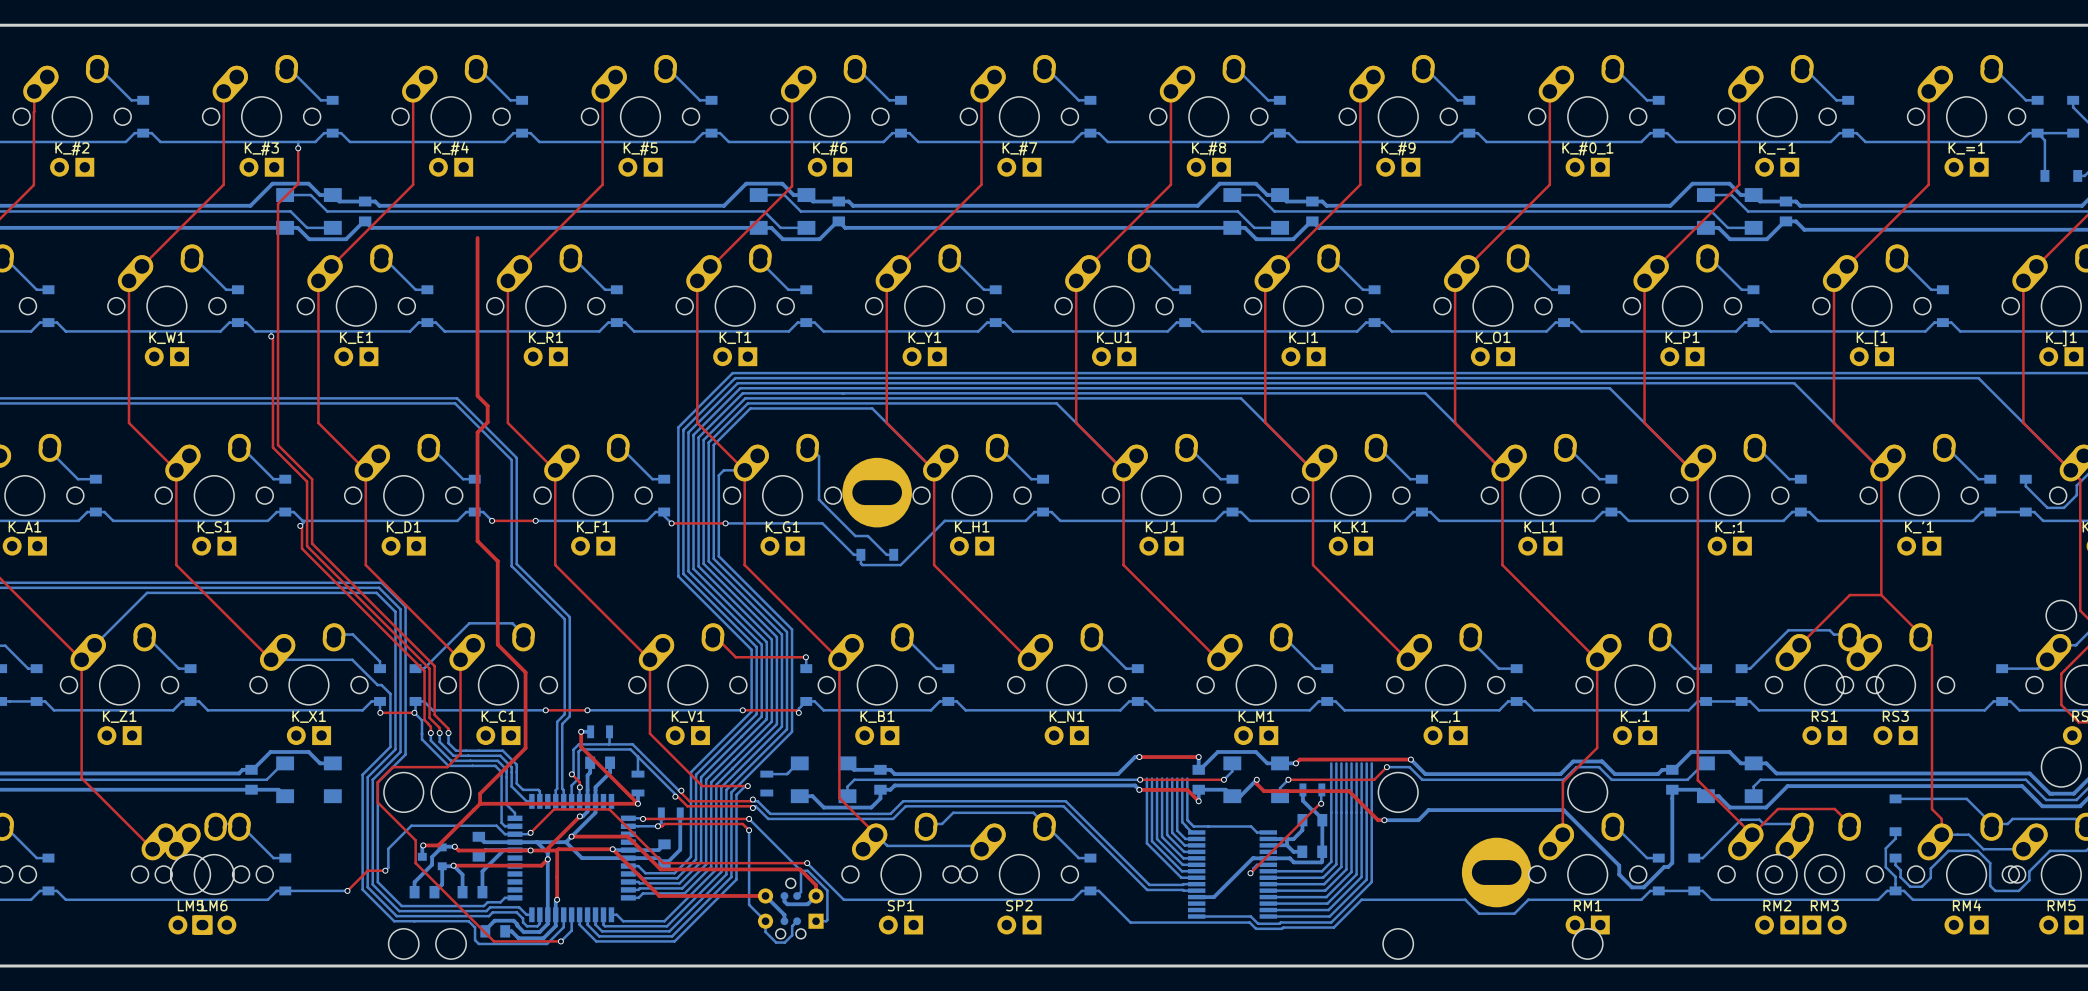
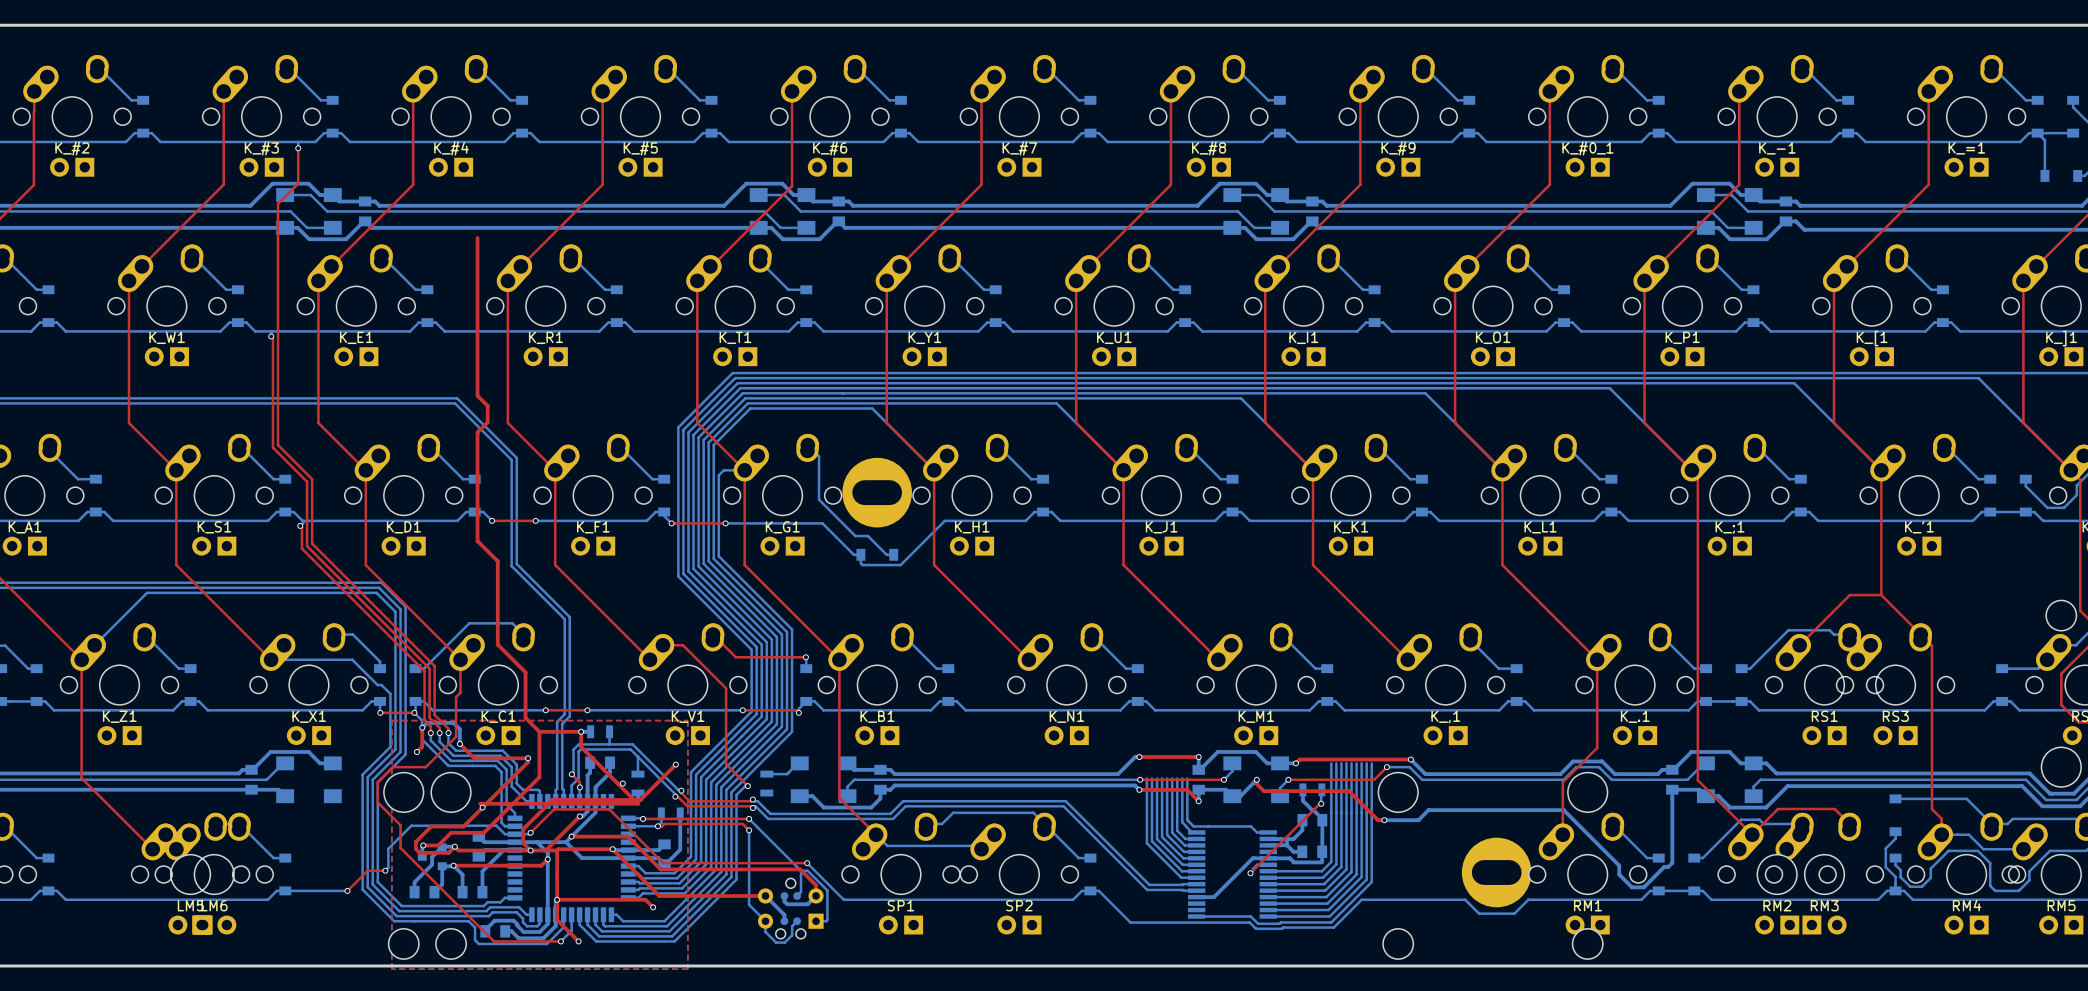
top track: (649, 659) (649, 733) (702, 786) (747, 786) -> (662, 645) (683, 645) (726, 688) (726, 764) (747, 786)
top track: (460, 692) (460, 753) (447, 767) (425, 767) -> (460, 692) (456, 697) (456, 736) (425, 767)
top track: (525, 717) (525, 748) (480, 793) (480, 803) (451, 832) -> (539, 731) (539, 777) (483, 832) (451, 832)
top track: none -> (525, 717) (539, 731)
top zone outline: none -> (391, 720) (391, 969) (687, 969) (687, 720) (391, 720)
bottom track: none -> (422, 727) (427, 722) (453, 722) (459, 729) (459, 743)
top track: none -> (422, 727) (422, 746) (416, 751)
via: none -> (422, 727)
top track: none -> (539, 731) (581, 731)
top track: none -> (459, 743) (474, 758) (528, 758) (528, 762) (463, 826) (431, 826) (415, 841) (415, 849) (419, 852) (448, 852) (454, 846)
via: none -> (459, 743)
via: none -> (416, 751)
via: none -> (528, 758)
top track: none -> (675, 764) (640, 799) (552, 799) (523, 829) (523, 843) (530, 850)
via: none -> (675, 764)
via position: (637, 803) -> (622, 783)
via: none -> (482, 807)
top track: (400, 825) (415, 840) (415, 863) -> (400, 825) (400, 847) (415, 863)
top track: none -> (653, 907) (645, 899) (557, 899) (557, 919) (578, 941)
via: none -> (653, 907)
via: none -> (578, 941)

